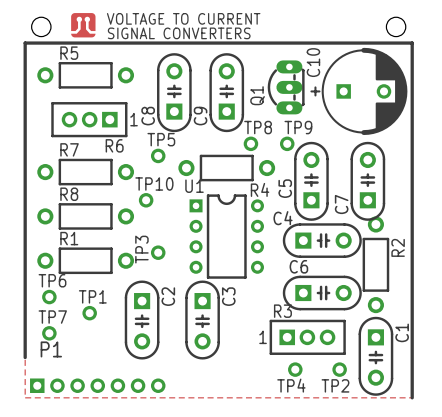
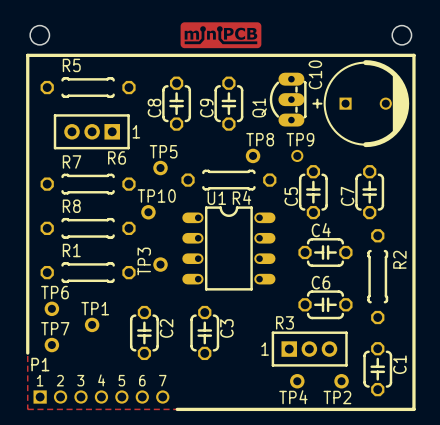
part footprint: [23, 13, 414, 400] -> [26, 22, 416, 412]
part text: VOLTAGE TO CURRENT (183, 18) -> none
part text: SIGNAL CONVERTERS (179, 33) -> none
C10 footprint: [310, 47, 408, 136] -> [312, 60, 410, 148]
C8 footprint: [157, 53, 192, 133] -> [162, 76, 192, 131]
C9 footprint: [209, 53, 245, 133] -> [214, 76, 244, 131]
R5 footprint: [37, 62, 135, 89] -> [40, 77, 136, 98]
C8 name position: C8 (148, 116) -> C8 (154, 108)
C9 name position: C9 (200, 116) -> C9 (206, 108)
TP9 footprint: [279, 136, 295, 152] -> [291, 149, 304, 163]
C5 footprint: [294, 141, 329, 221] -> [298, 165, 328, 220]
C7 footprint: [350, 141, 386, 221] -> [355, 165, 385, 220]
R4 footprint: [178, 154, 276, 182] -> [181, 169, 277, 191]
R7 footprint: [37, 158, 135, 186] -> [40, 173, 136, 195]
U1 name position: U1 (194, 186) -> U1 (216, 198)
R4 name position: R4 (260, 189) -> R4 (242, 197)
U1 footprint: [189, 194, 264, 279] -> [182, 206, 276, 291]
R8 footprint: [37, 203, 135, 230] -> [40, 217, 136, 239]
C7 name position: C7 (341, 204) -> C7 (347, 196)
R2 footprint: [362, 216, 390, 314] -> [367, 229, 389, 325]
C4 name position: C4 (283, 218) -> C4 (321, 230)
C4 footprint: [282, 223, 362, 258] -> [298, 238, 353, 267]
R1 footprint: [37, 247, 135, 275] -> [40, 262, 136, 284]
C6 name position: C6 (298, 266) -> C6 (321, 282)
C6 footprint: [282, 275, 362, 311] -> [298, 290, 353, 320]
C2 footprint: [124, 280, 160, 360] -> [129, 305, 159, 361]
C3 footprint: [185, 280, 220, 360] -> [190, 305, 220, 361]
C2 name position: C2 (168, 296) -> C2 (166, 328)
C3 name position: C3 (228, 296) -> C3 (226, 328)
C1 footprint: [358, 316, 394, 396] -> [363, 342, 393, 397]
C1 name position: C1 (402, 332) -> C1 (399, 364)
part: (97, 385) -> none

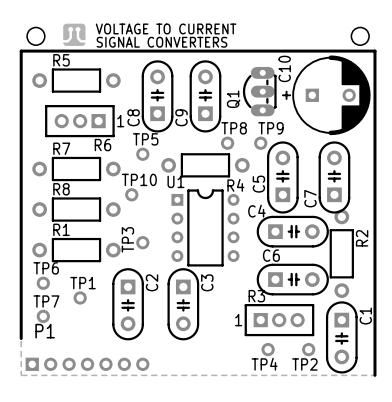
part footprint: [26, 22, 416, 412] -> [19, 23, 377, 377]
part text: none -> VOLTAGE TO CURRENT (166, 28)
part text: none -> SIGNAL CONVERTERS (161, 42)
C10 footprint: [312, 60, 410, 148] -> [281, 55, 371, 136]
C8 footprint: [162, 76, 192, 131] -> [141, 60, 174, 133]
C9 footprint: [214, 76, 244, 131] -> [189, 60, 222, 133]
R5 footprint: [40, 77, 136, 98] -> [32, 68, 121, 93]
C8 name position: C8 (154, 108) -> C8 (133, 117)
C9 name position: C9 (206, 108) -> C9 (181, 117)
TP9 footprint: [291, 149, 304, 163] -> [254, 136, 268, 150]
C5 footprint: [298, 165, 328, 220] -> [267, 141, 299, 214]
C7 footprint: [355, 165, 385, 220] -> [318, 141, 351, 214]
R4 footprint: [181, 169, 277, 191] -> [161, 153, 250, 178]
R7 footprint: [40, 173, 136, 195] -> [32, 156, 121, 182]
C7 name position: C7 (347, 196) -> C7 (310, 198)
R4 name position: R4 (242, 197) -> R4 (235, 185)
U1 name position: U1 (216, 198) -> U1 (175, 181)
U1 footprint: [182, 206, 276, 291] -> [171, 189, 240, 267]
R8 footprint: [40, 217, 136, 239] -> [32, 197, 121, 222]
R2 footprint: [367, 229, 389, 325] -> [329, 209, 354, 298]
C4 name position: C4 (321, 230) -> C4 (256, 211)
C4 footprint: [298, 238, 353, 267] -> [256, 215, 329, 248]
R1 footprint: [40, 262, 136, 284] -> [32, 237, 121, 263]
C6 name position: C6 (321, 282) -> C6 (271, 255)
C6 footprint: [298, 290, 353, 320] -> [256, 263, 329, 296]
C2 footprint: [129, 305, 159, 361] -> [112, 268, 144, 341]
C3 footprint: [190, 305, 220, 361] -> [167, 268, 200, 341]
C2 name position: C2 (166, 328) -> C2 (152, 282)
C3 name position: C3 (226, 328) -> C3 (207, 282)
C1 footprint: [363, 342, 393, 397] -> [325, 301, 358, 374]
C1 name position: C1 (399, 364) -> C1 (365, 316)
part: none -> (87, 364)

